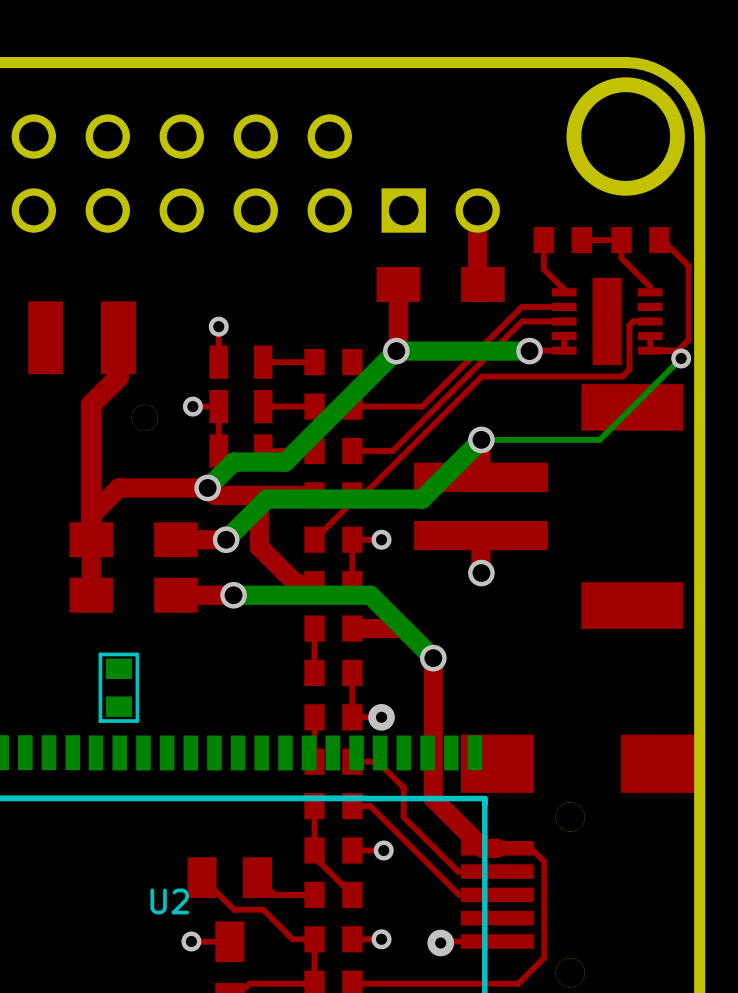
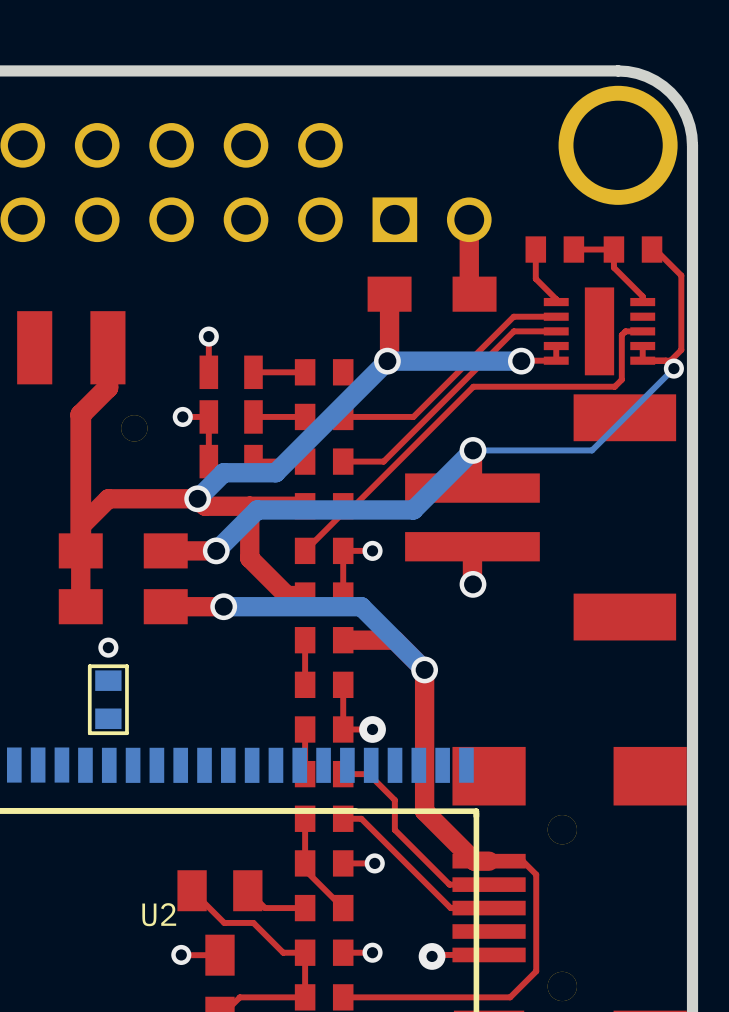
via: none -> (108, 647)

